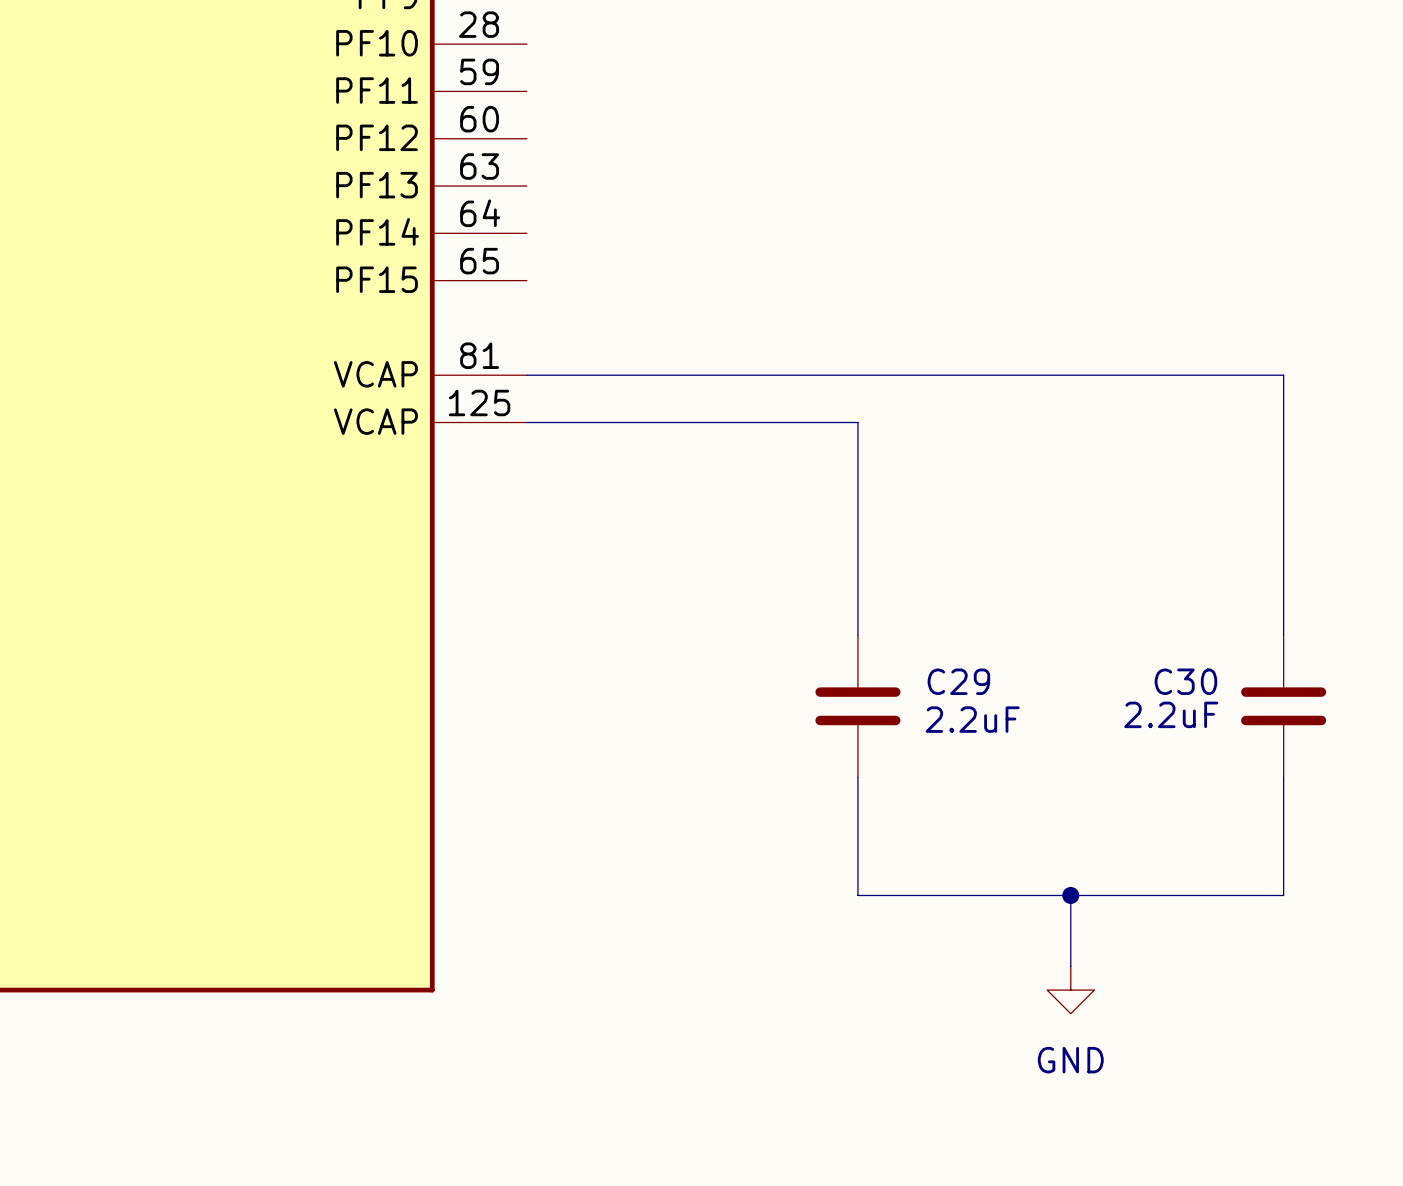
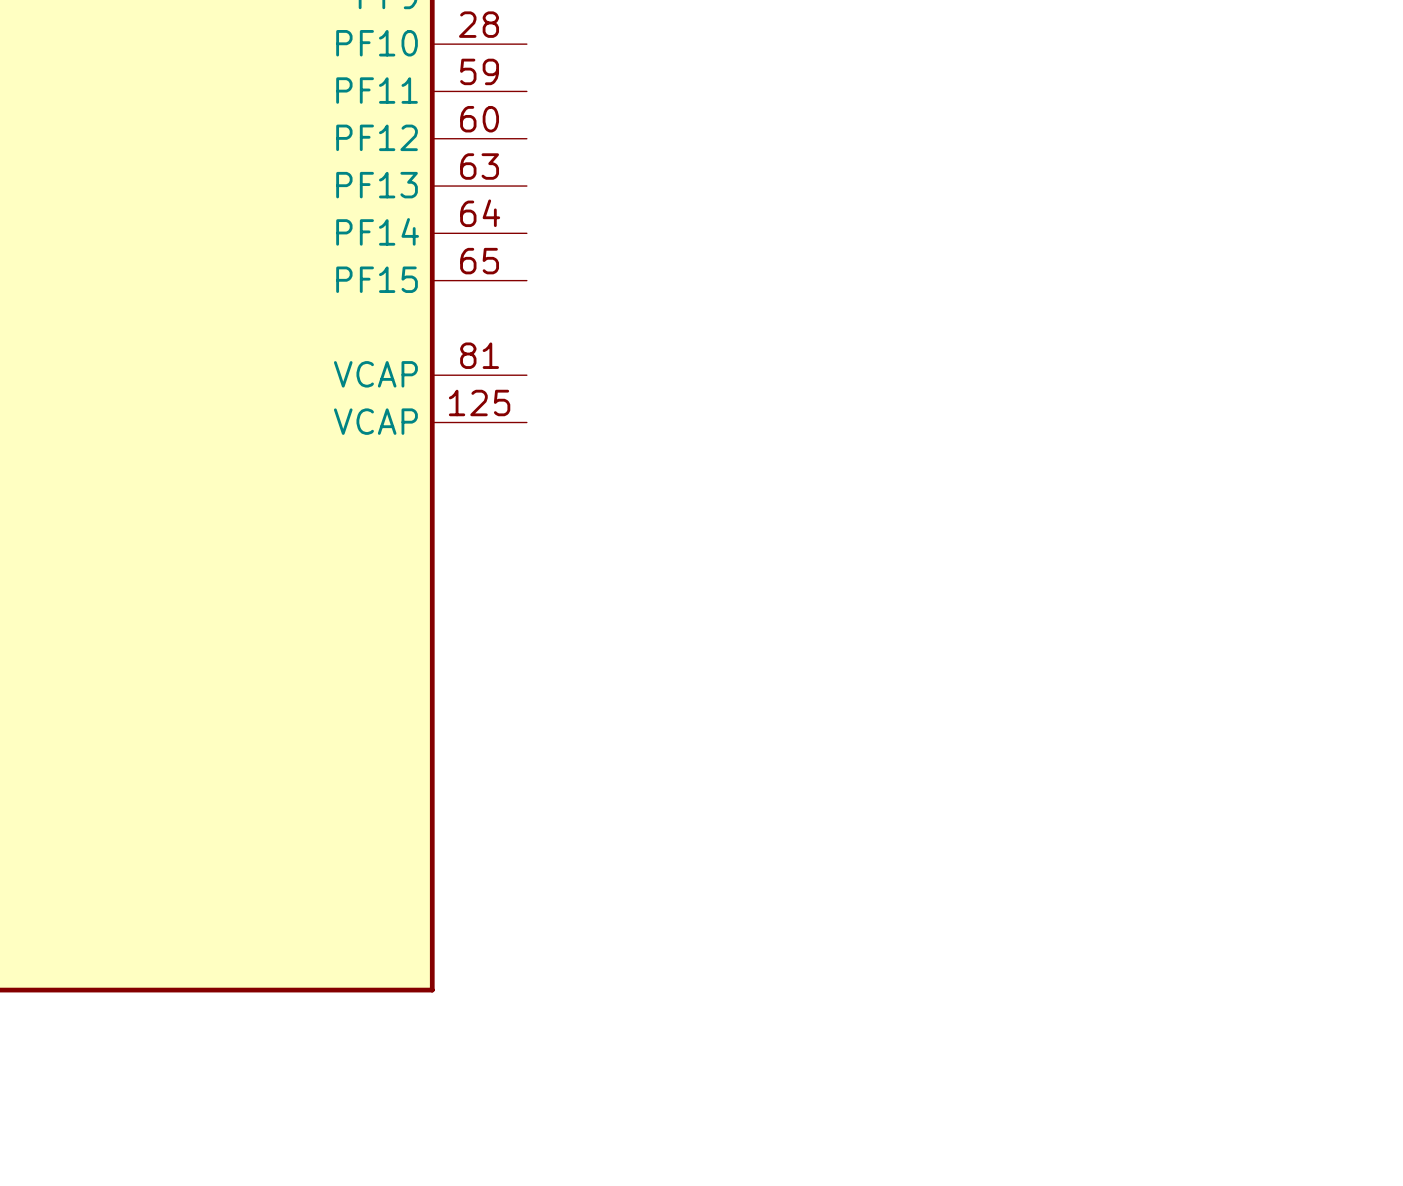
wire: (526, 375) (1283, 375) (1283, 635) -> none
wire: (526, 422) (857, 422) (857, 635) -> none
C29: 2.2uF (857, 706) -> none
C30: 2.2uF (1283, 706) -> none
wire: (857, 777) (857, 895) (1283, 895) (1283, 777) -> none
wire: (1070, 895) (1070, 966) -> none
junction: (1070, 895) -> none
power symbol: GND (1070, 990) -> none

